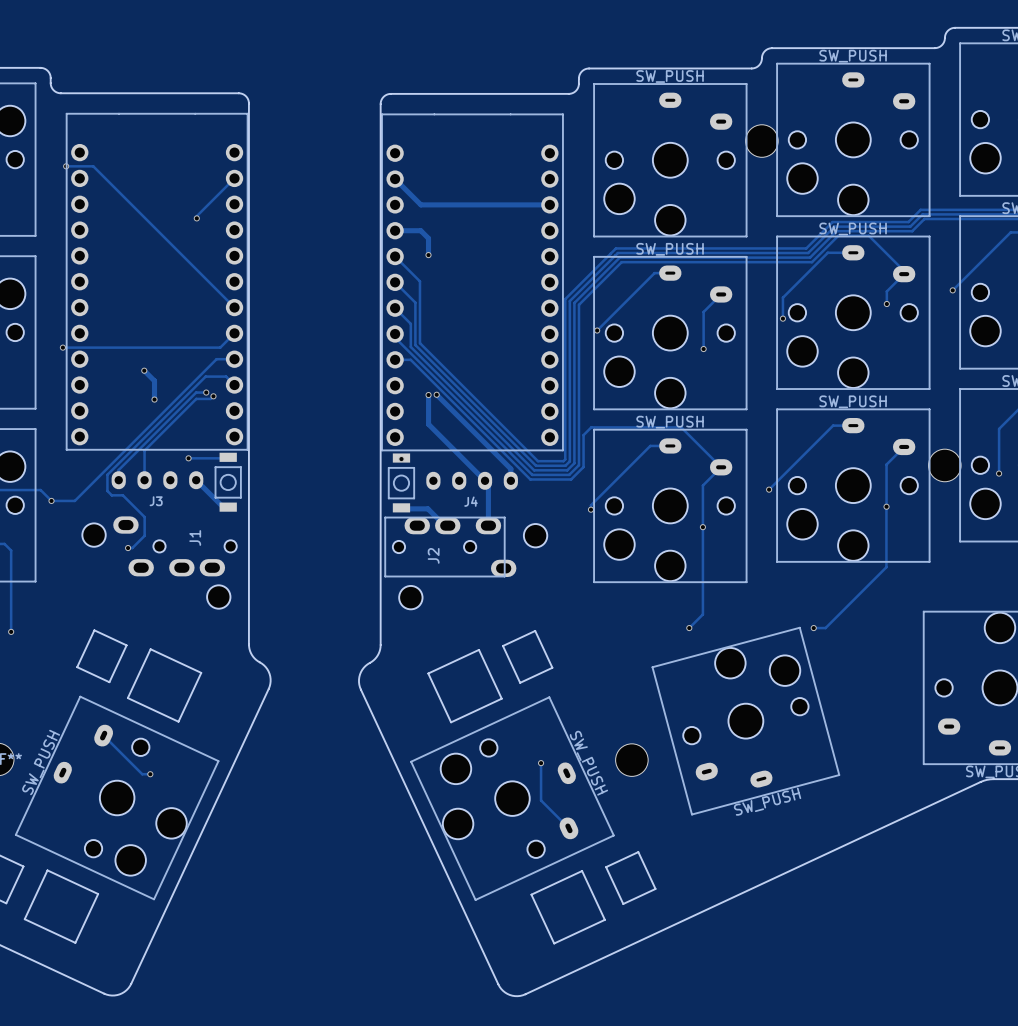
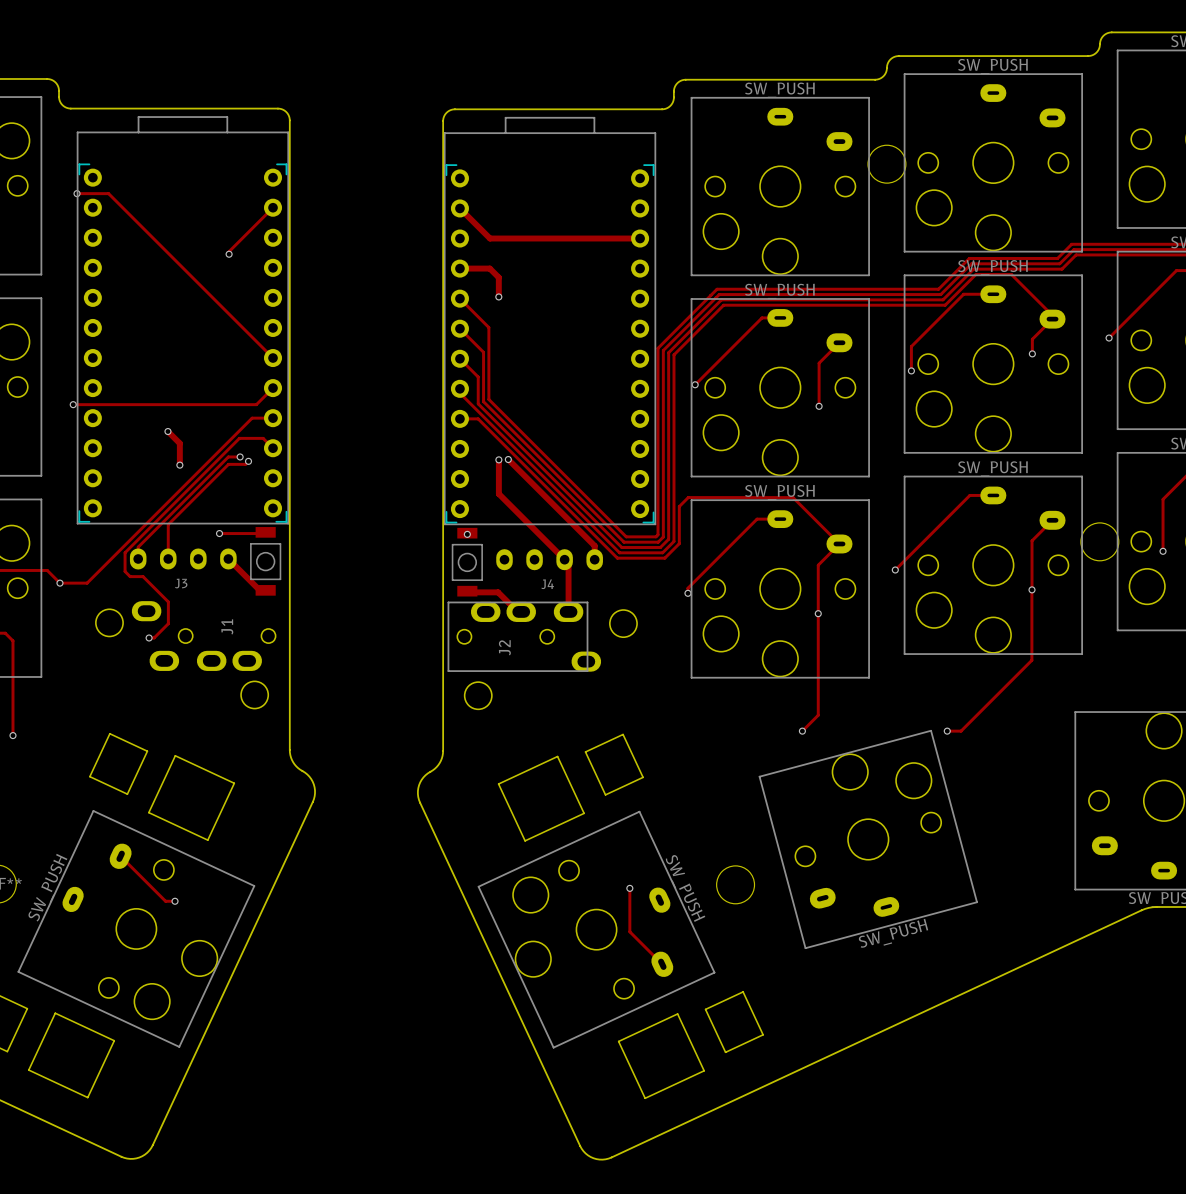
part footprint: [65, 112, 249, 451] -> [76, 116, 290, 525]
part footprint: [381, 113, 564, 452] -> [443, 116, 657, 526]

